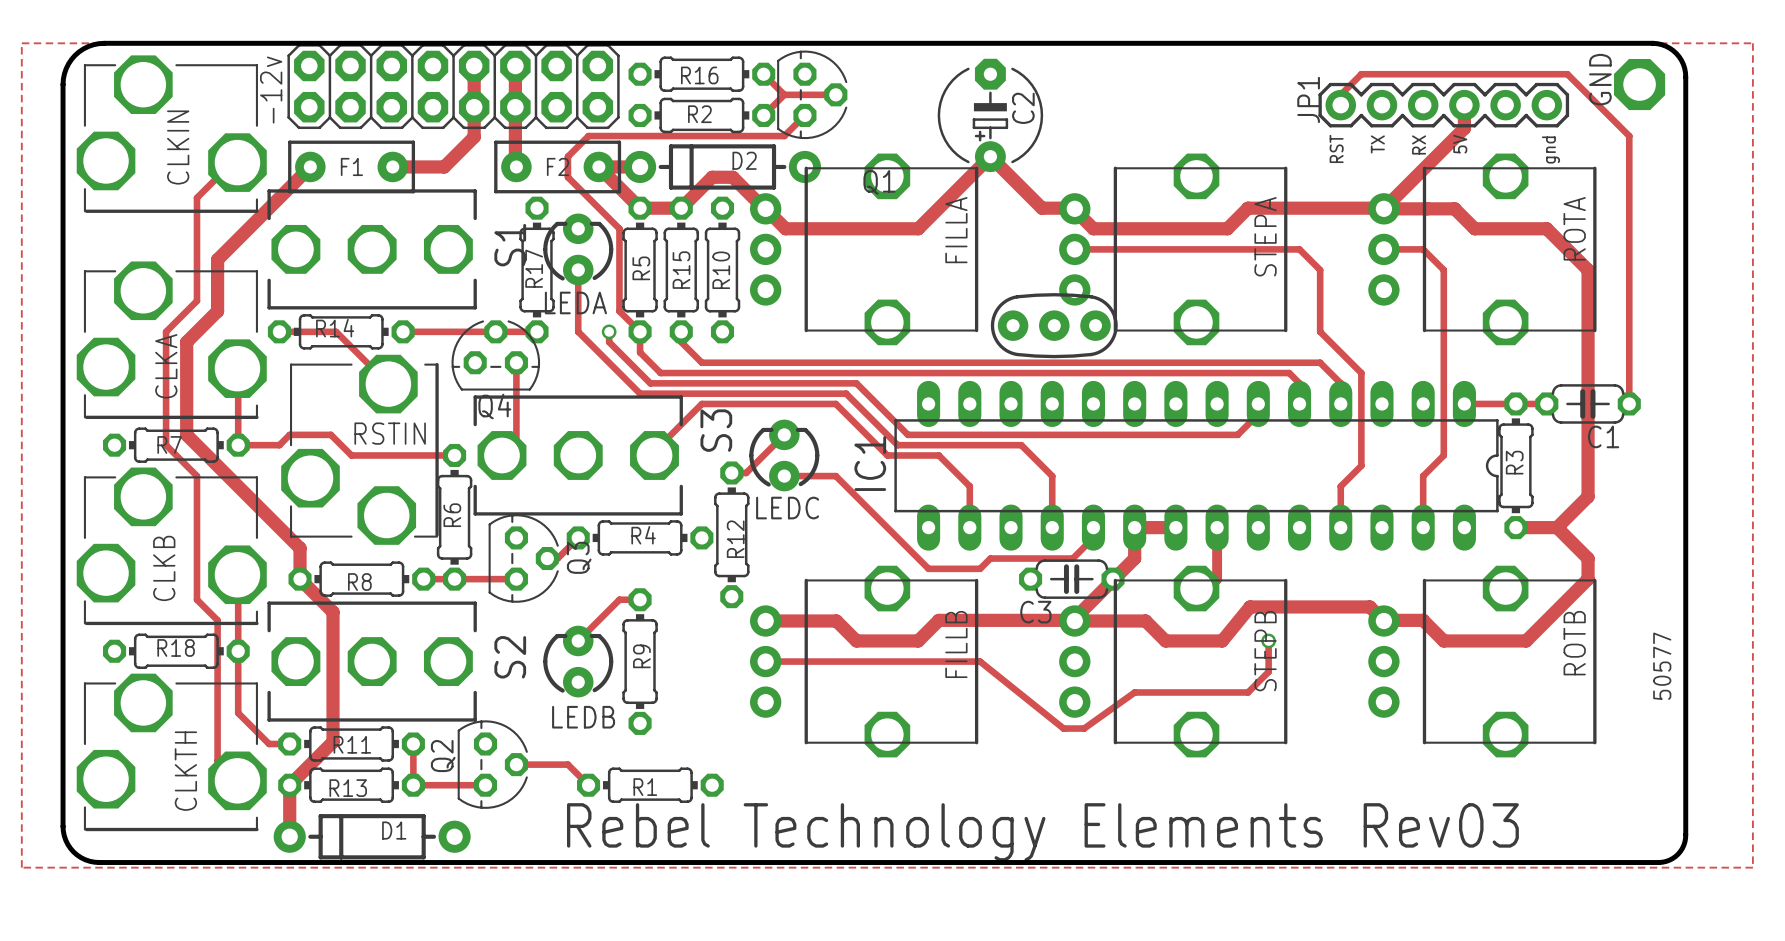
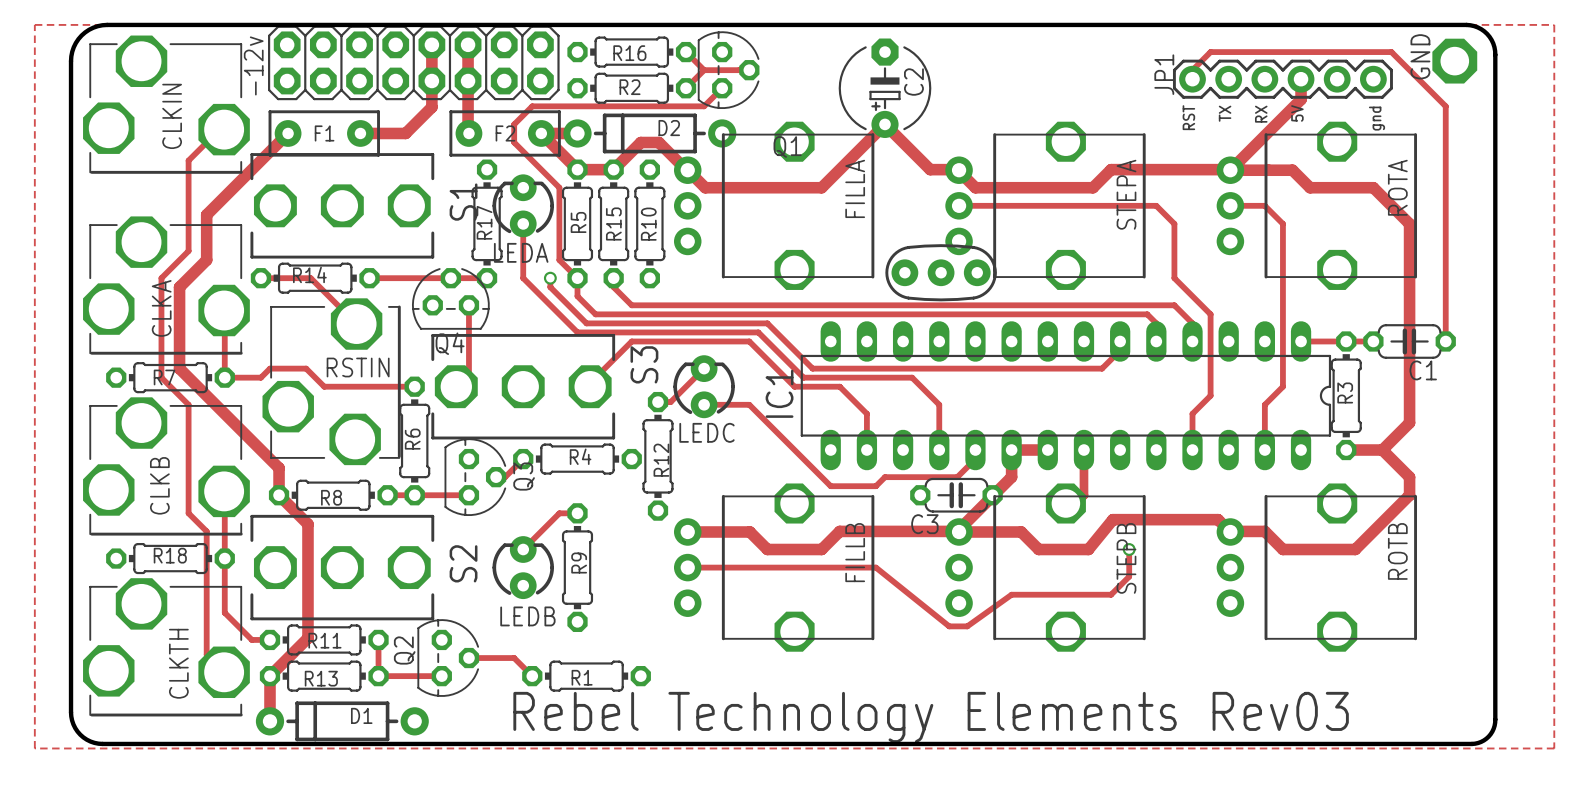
text: 50577 (1662, 666) -> none

